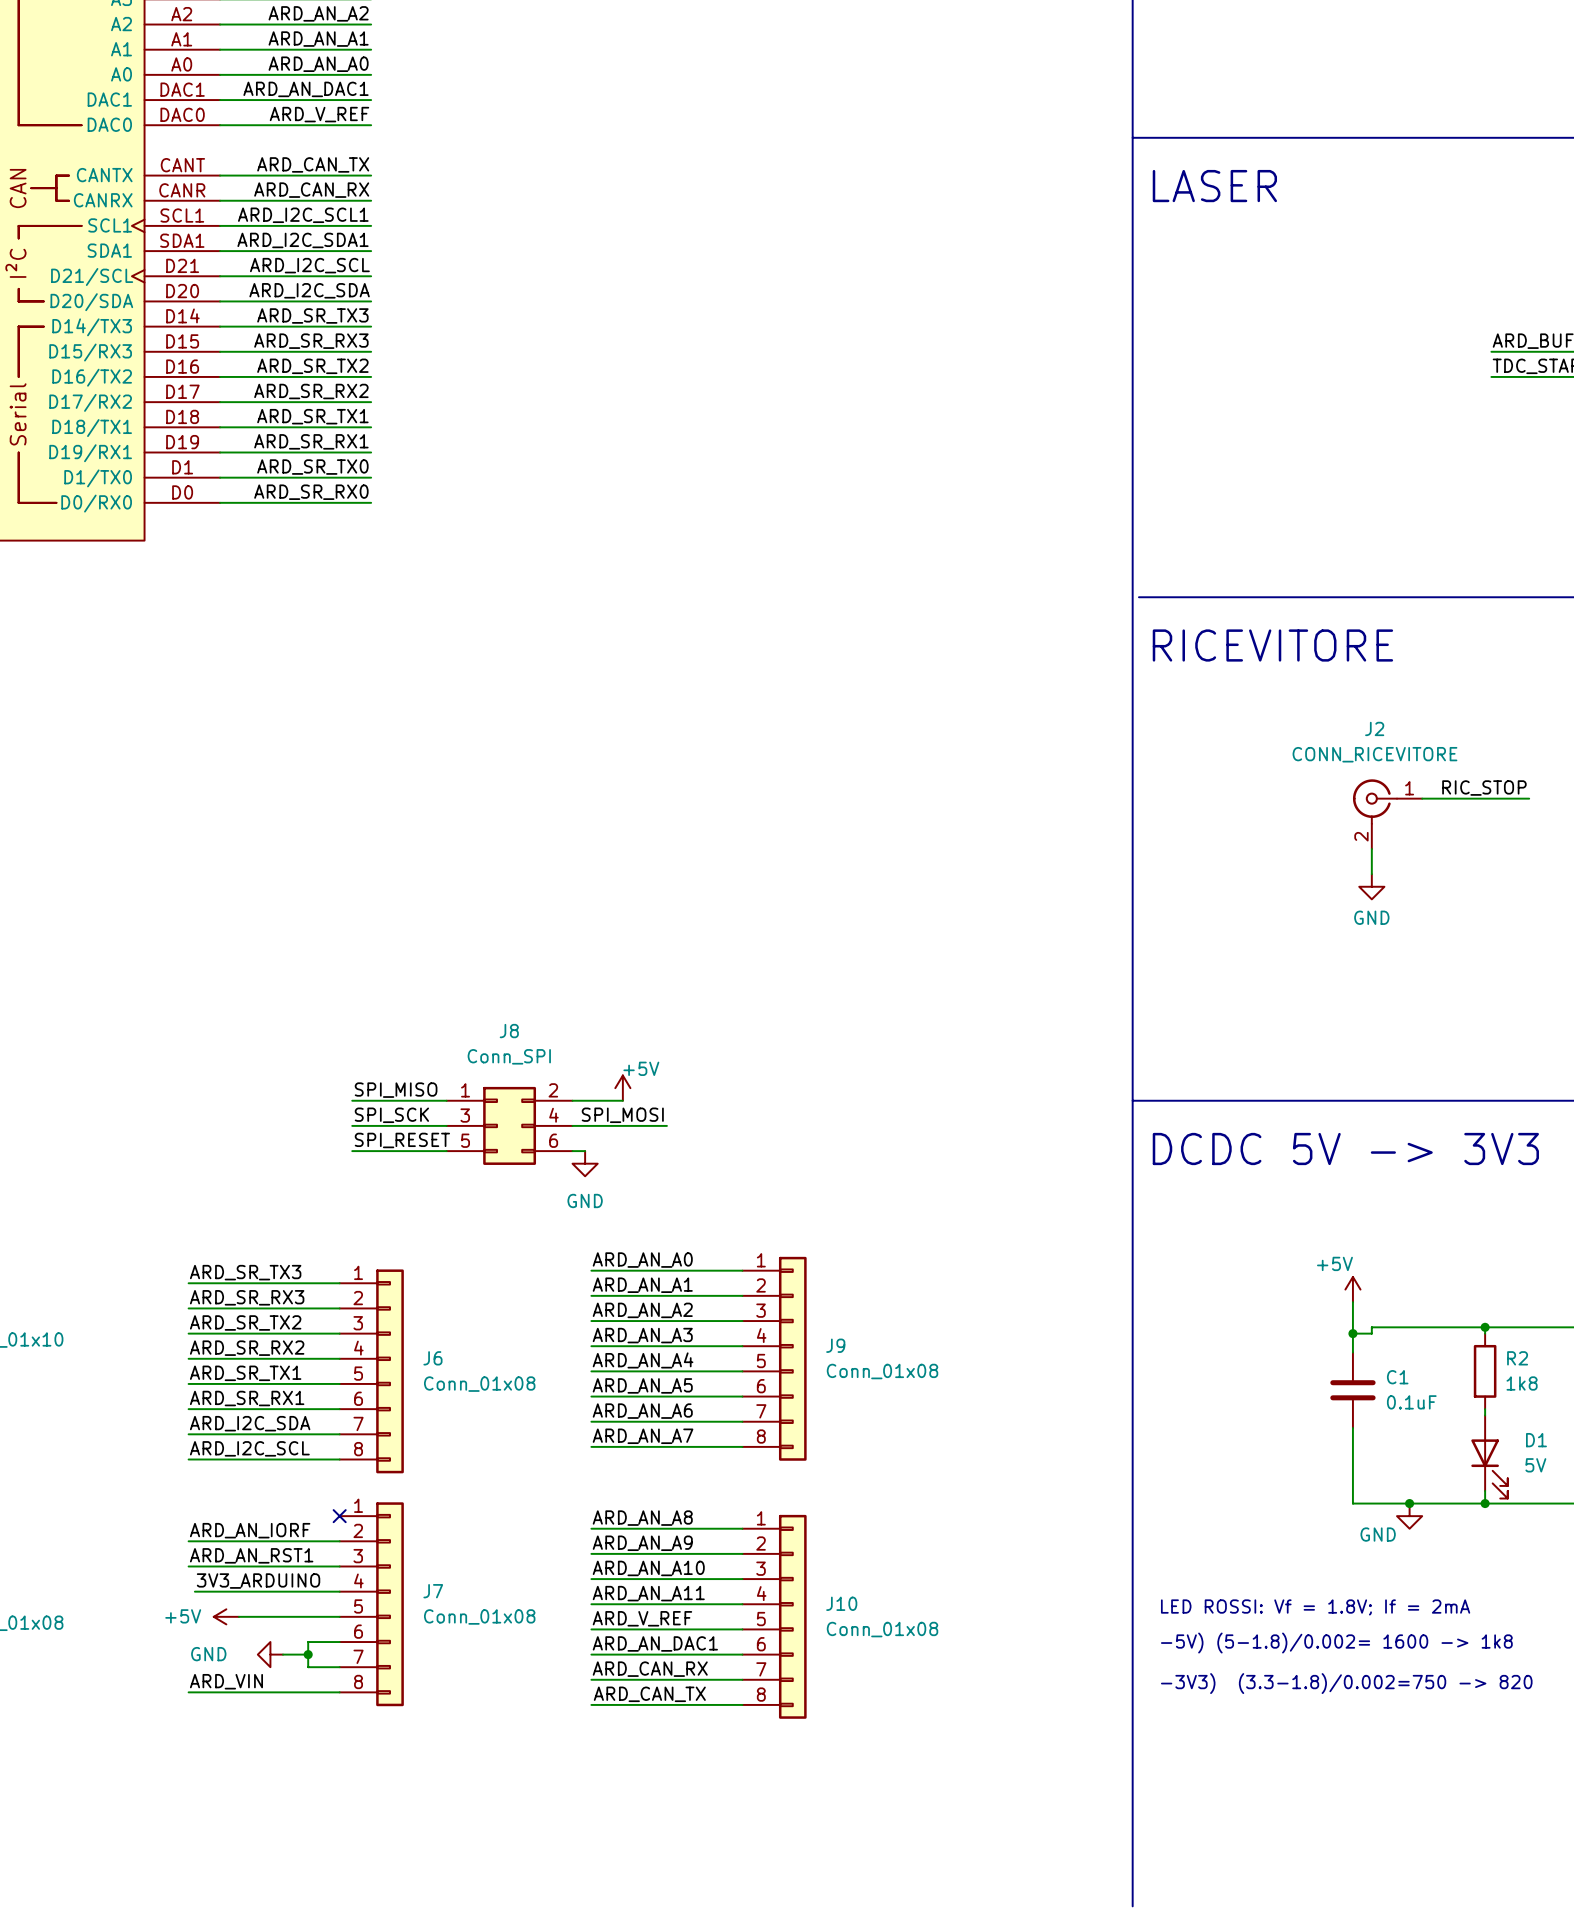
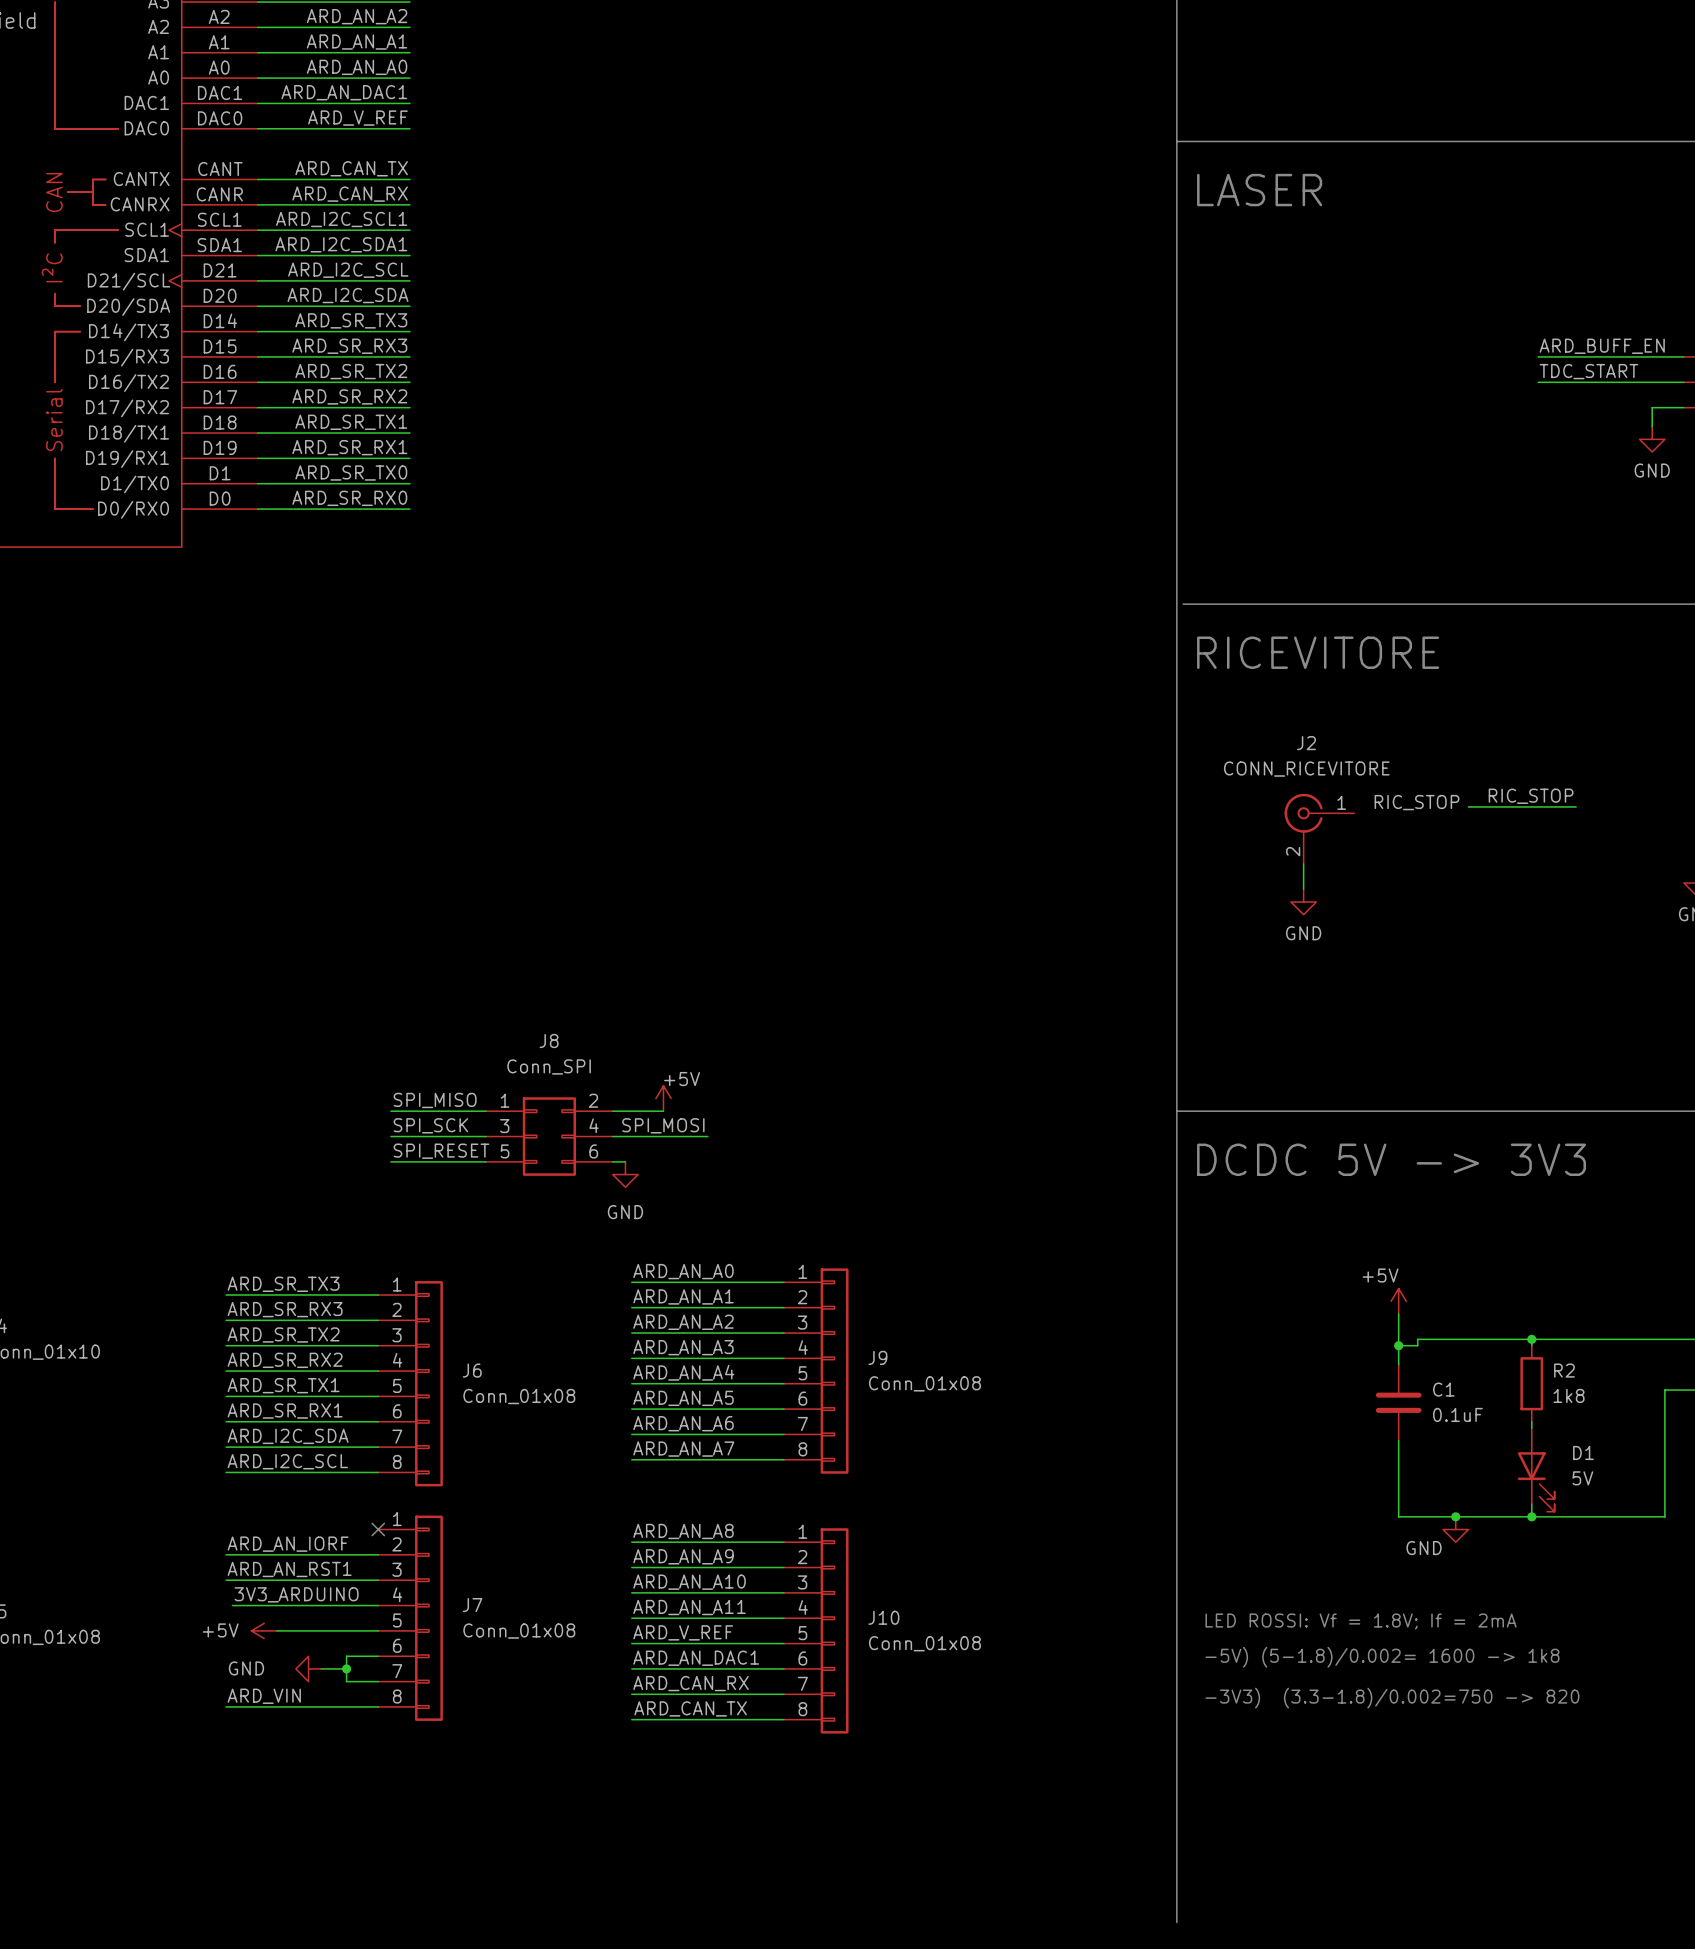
label: none -> RIC_STOP (1417, 802)
J2 position: (1387, 814) -> (1319, 828)
wire: (1371, 849) (1371, 874) -> (1303, 864) (1303, 889)
power symbol position: GND (1371, 886) -> GND (1303, 902)

